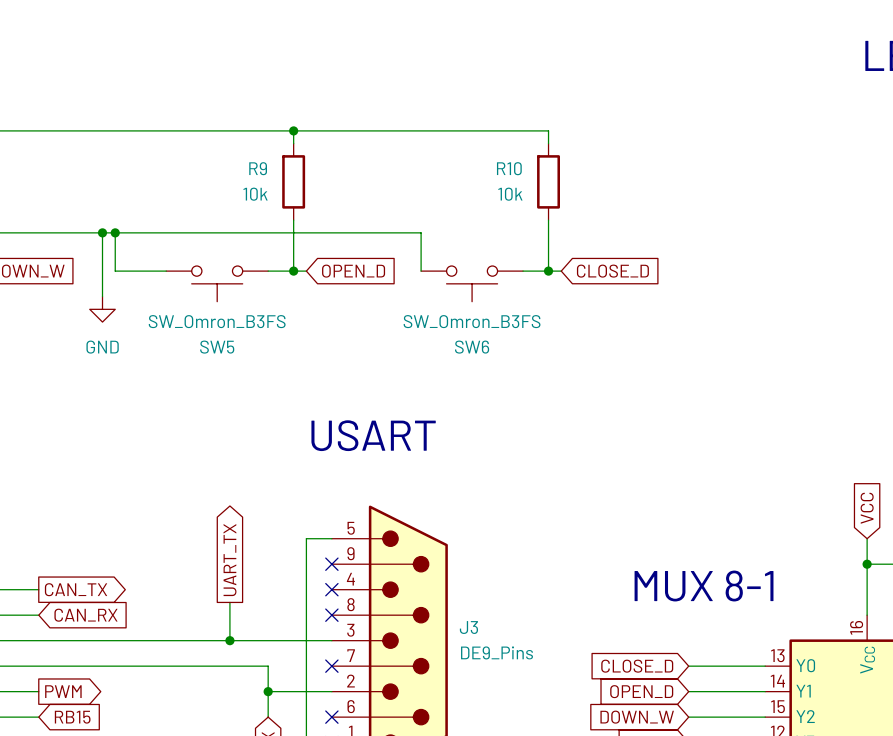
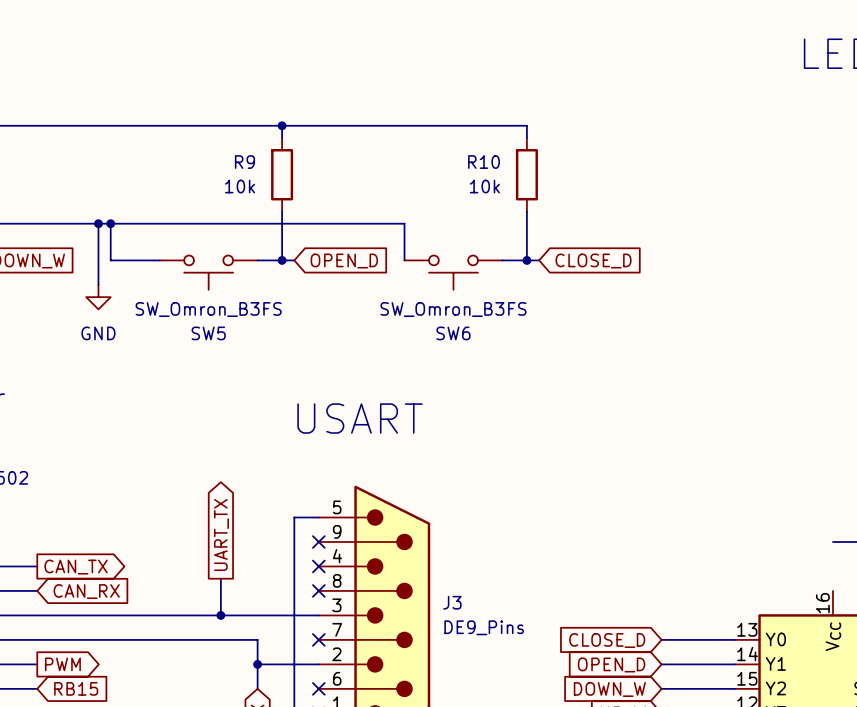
global label: VCC (867, 508) -> none
wire: (867, 538) (867, 615) -> none
junction: (867, 564) -> none
text: MUX 8-1 (704, 586) -> none

